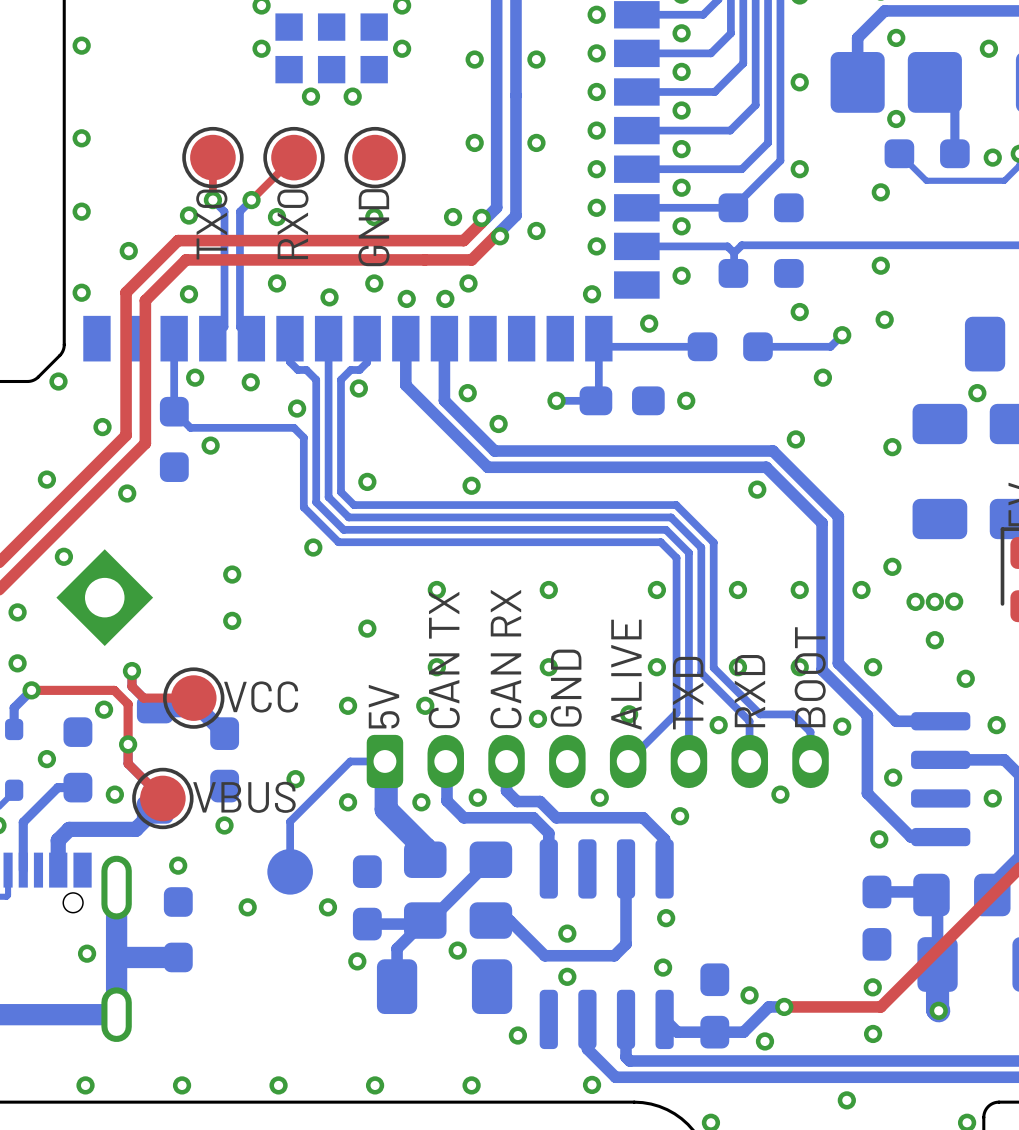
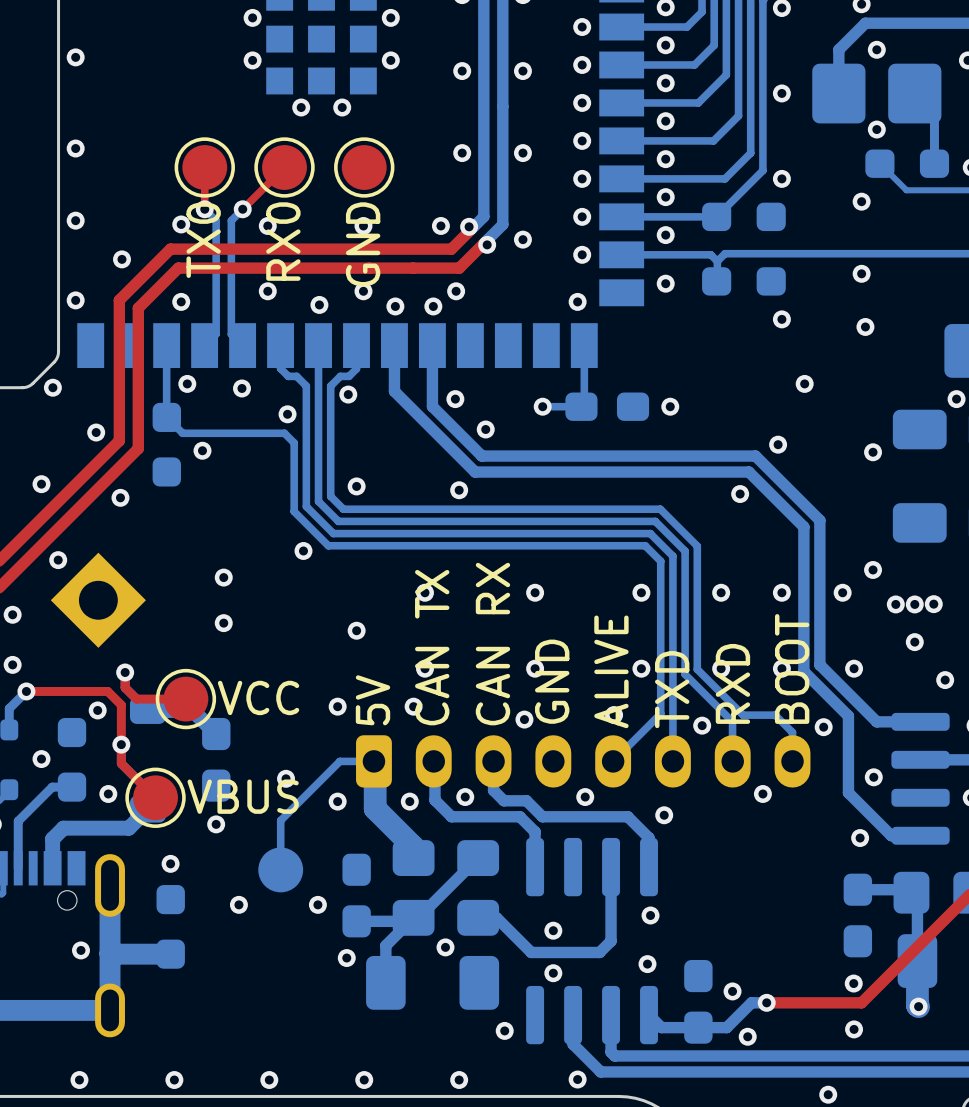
via: (649, 323) -> none
bottom track: (842, 335) (830, 346) (757, 346) -> none
via: (842, 335) -> none
bottom track: (598, 338) (606, 346) (702, 346) -> none
part: (730, 346) -> none

